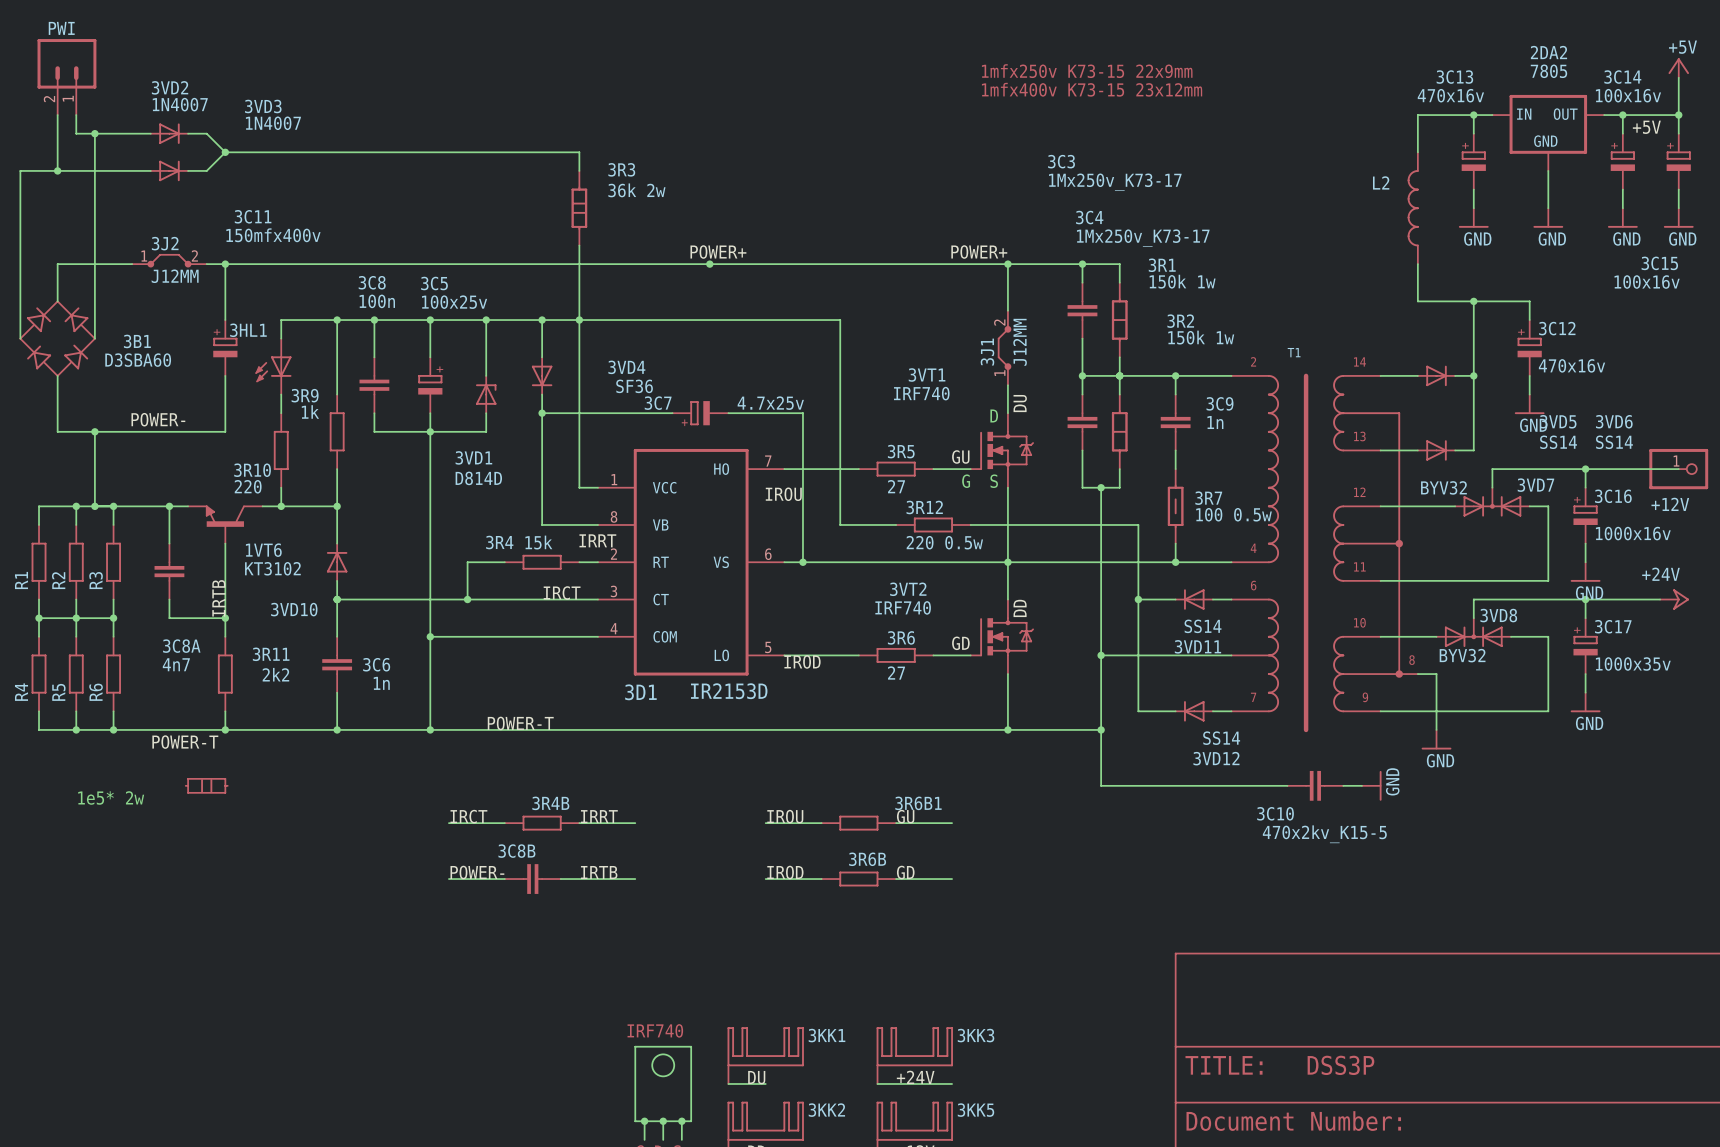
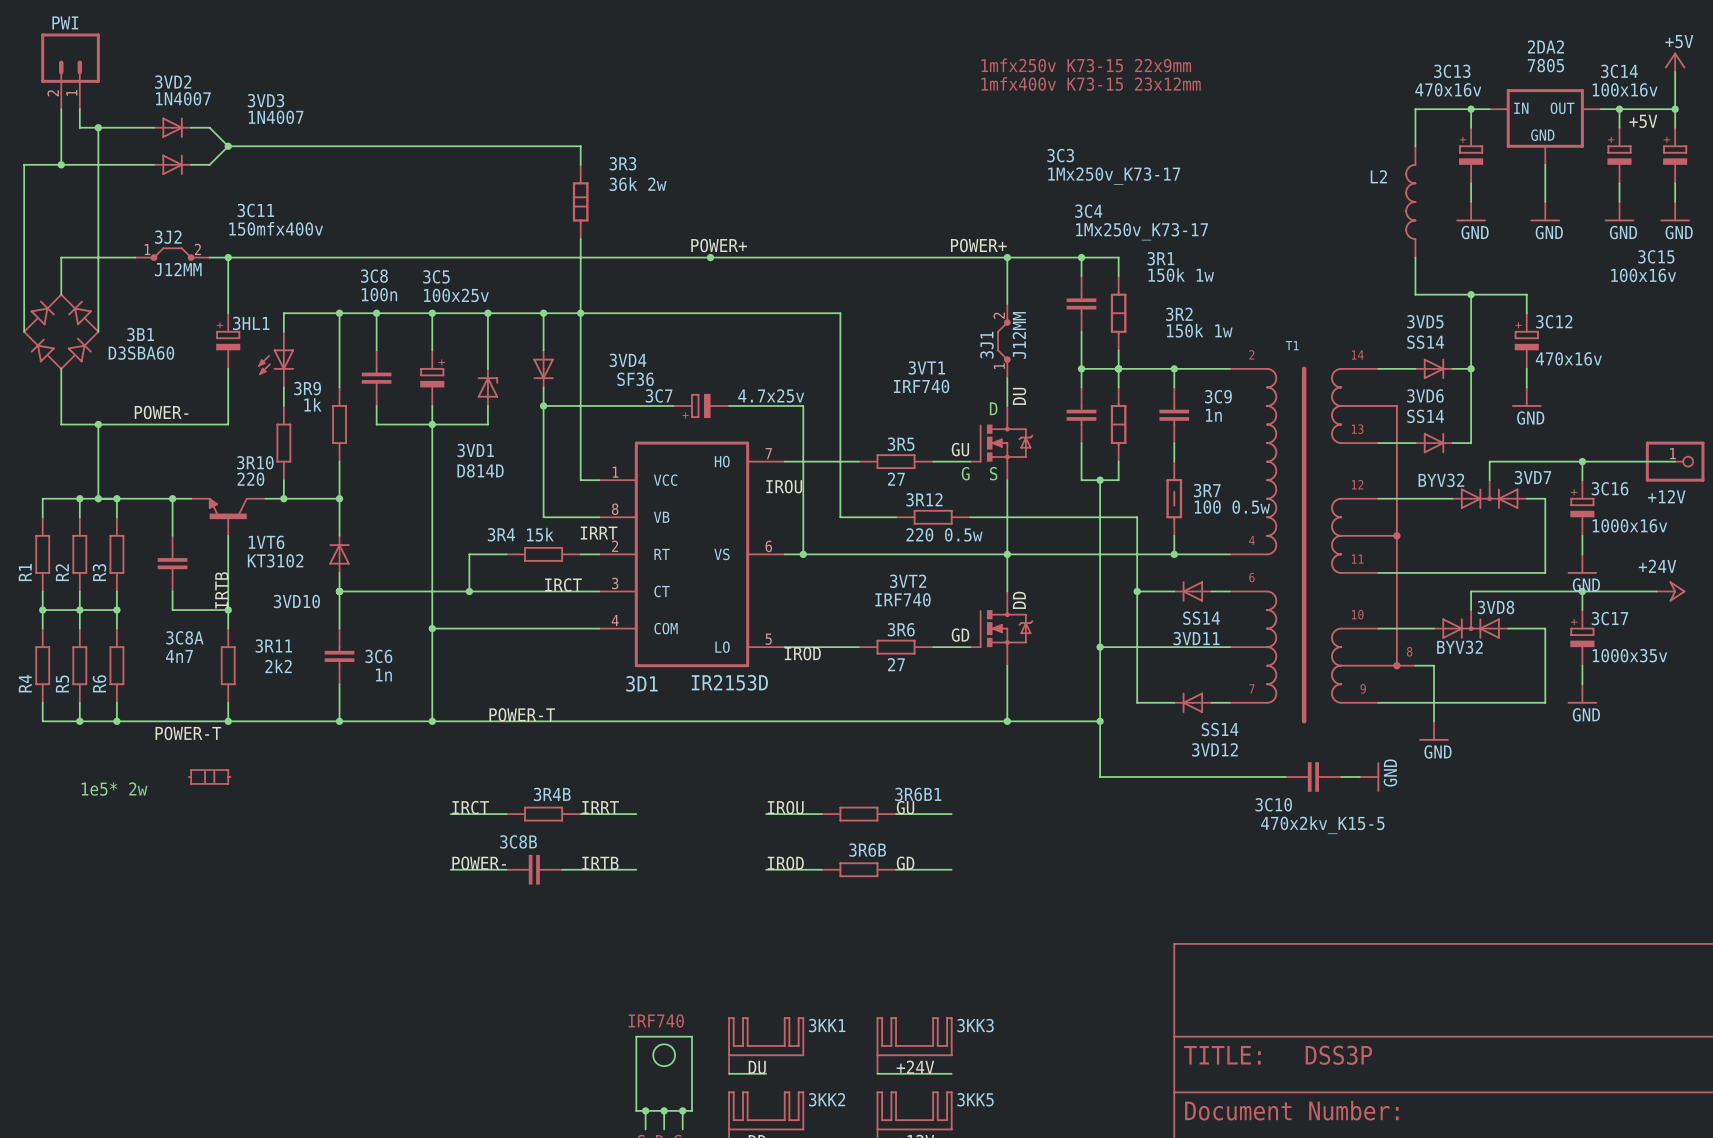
3VD5 name position: 3VD5 (1558, 421) -> 3VD5 (1425, 321)
3VD6 name position: 3VD6 (1614, 421) -> 3VD6 (1425, 395)
3VD5 value position: SS14 (1558, 442) -> SS14 (1425, 342)
3VD6 value position: SS14 (1614, 442) -> SS14 (1425, 416)

